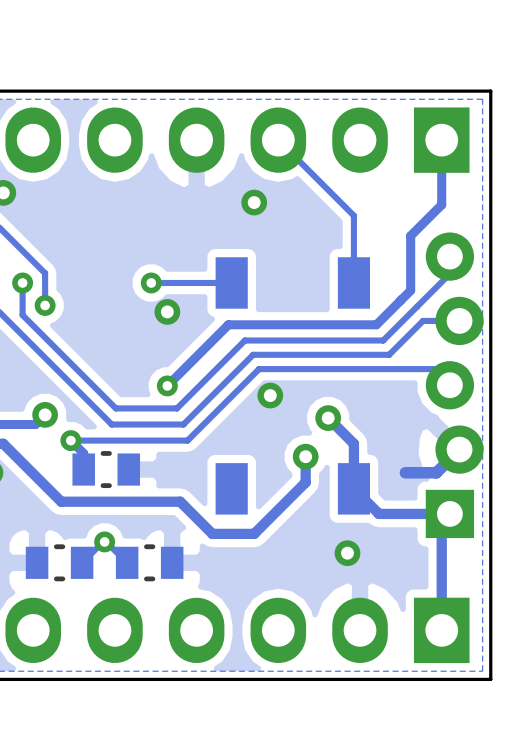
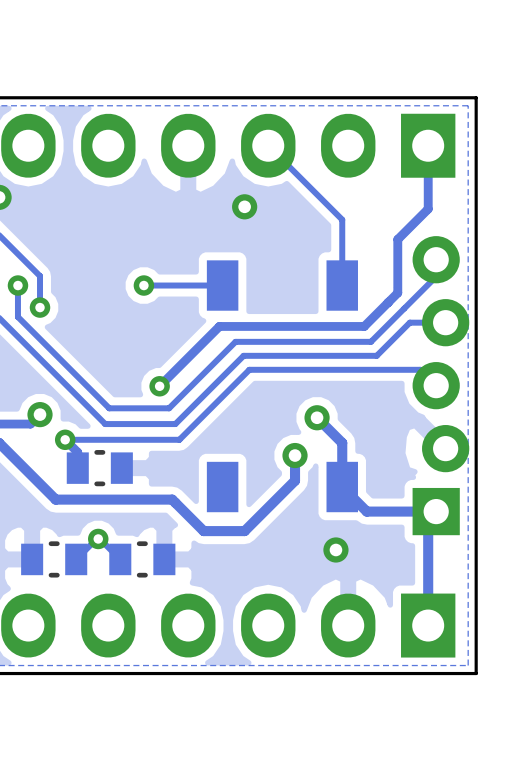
via: (167, 311) -> none
via: (270, 395) -> none
track: (459, 449) (436, 472) (405, 472) -> none

